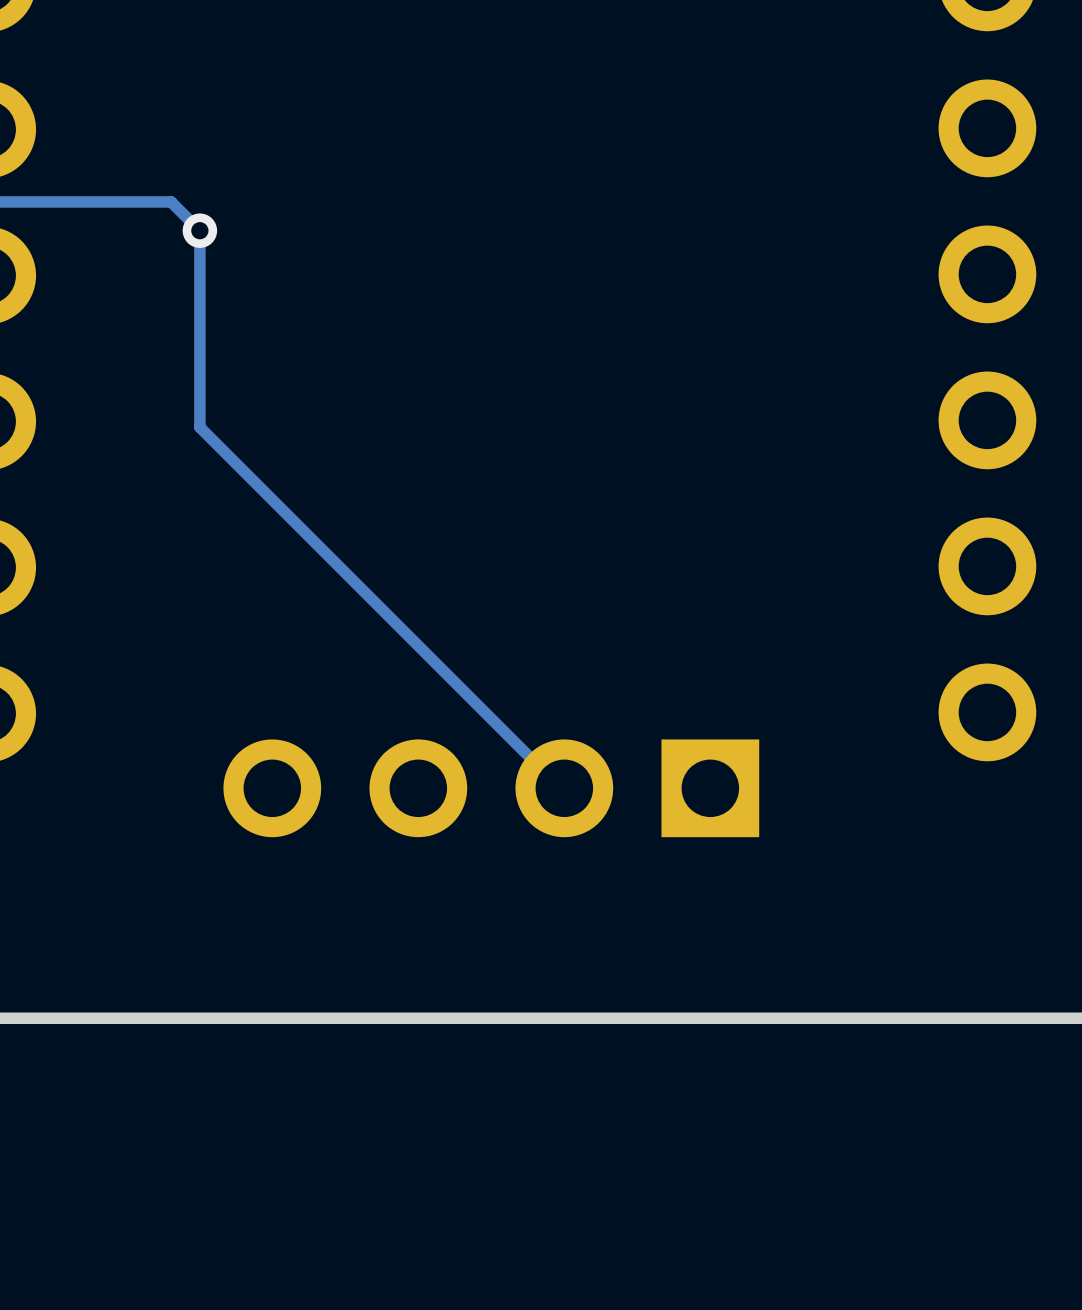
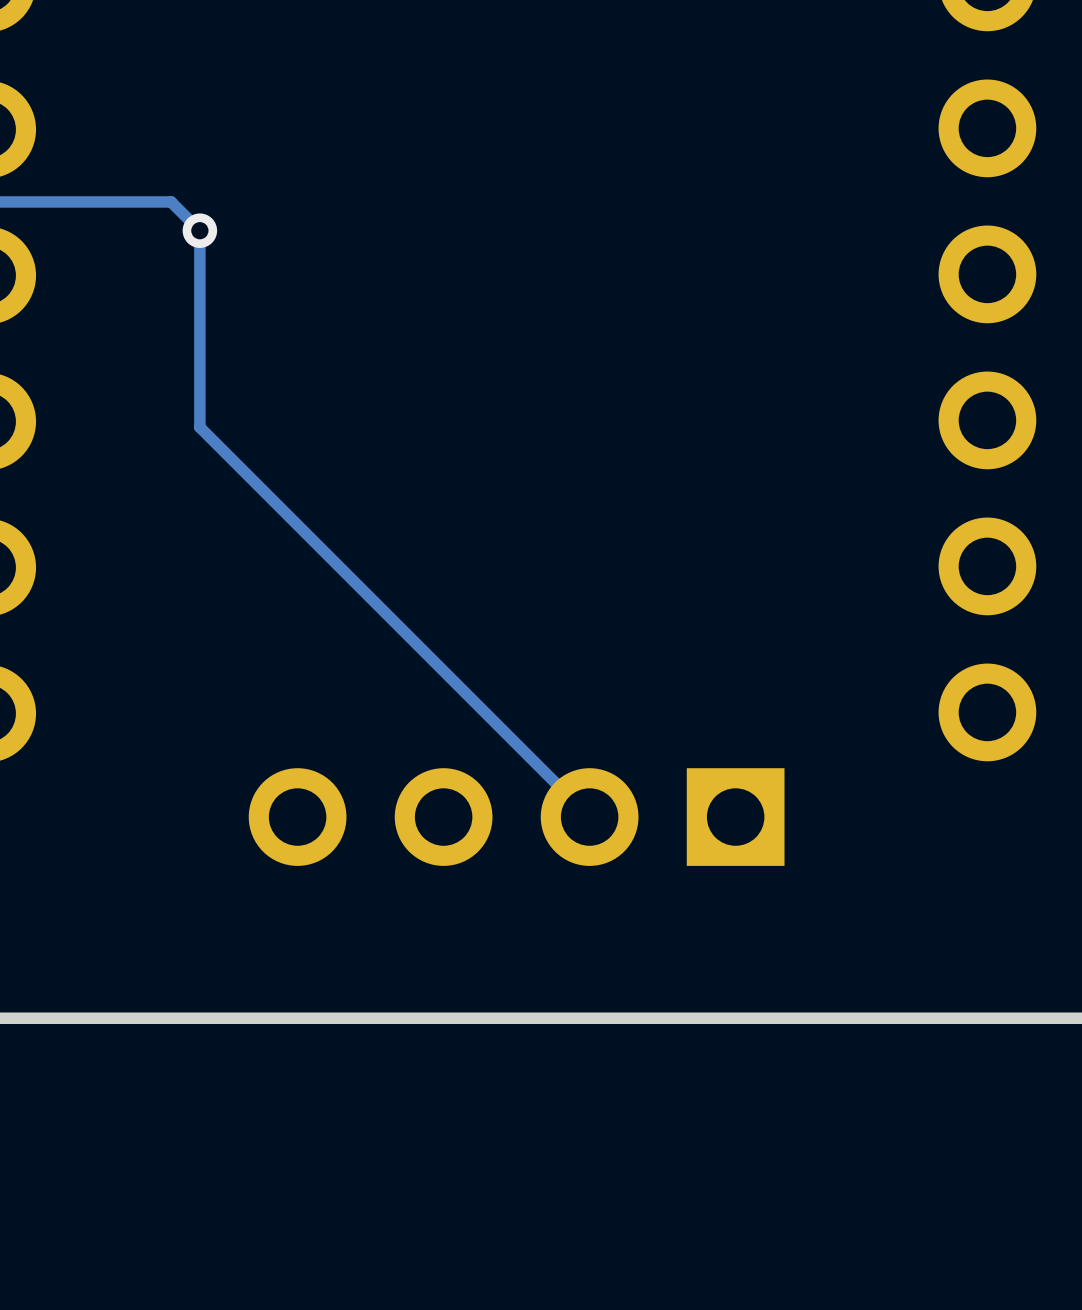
part position: (491, 788) -> (516, 817)

